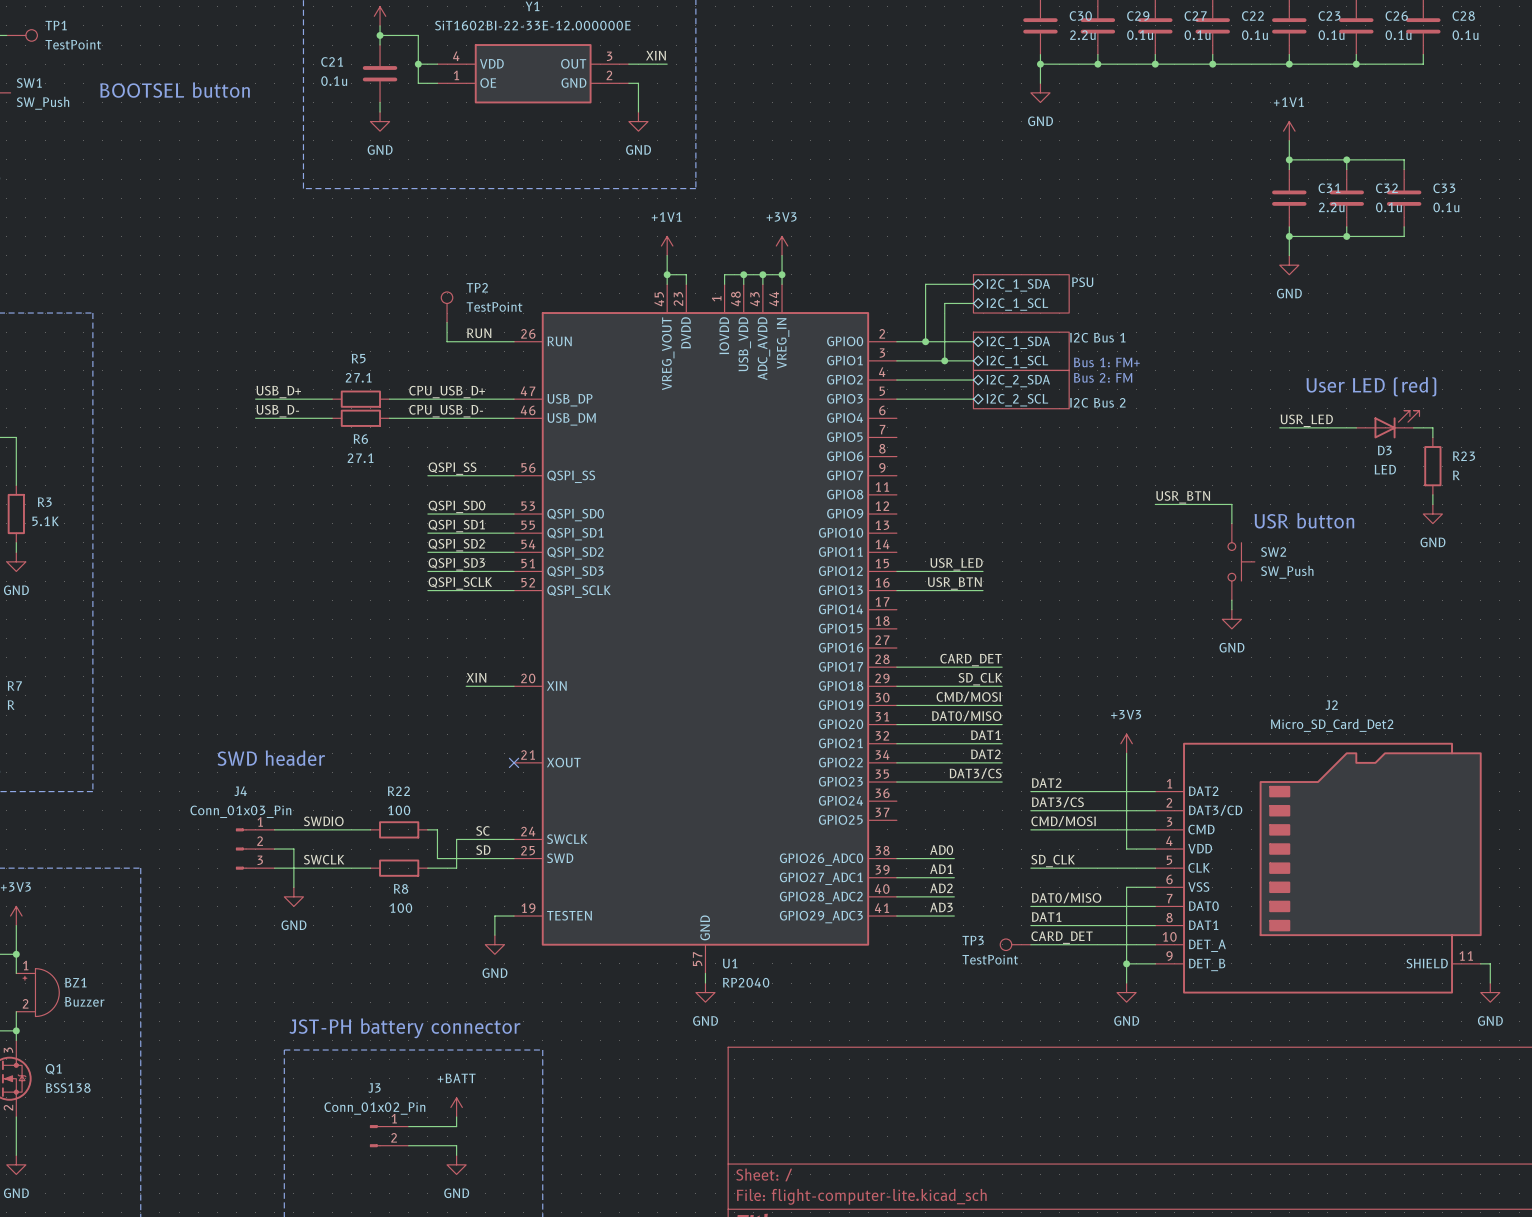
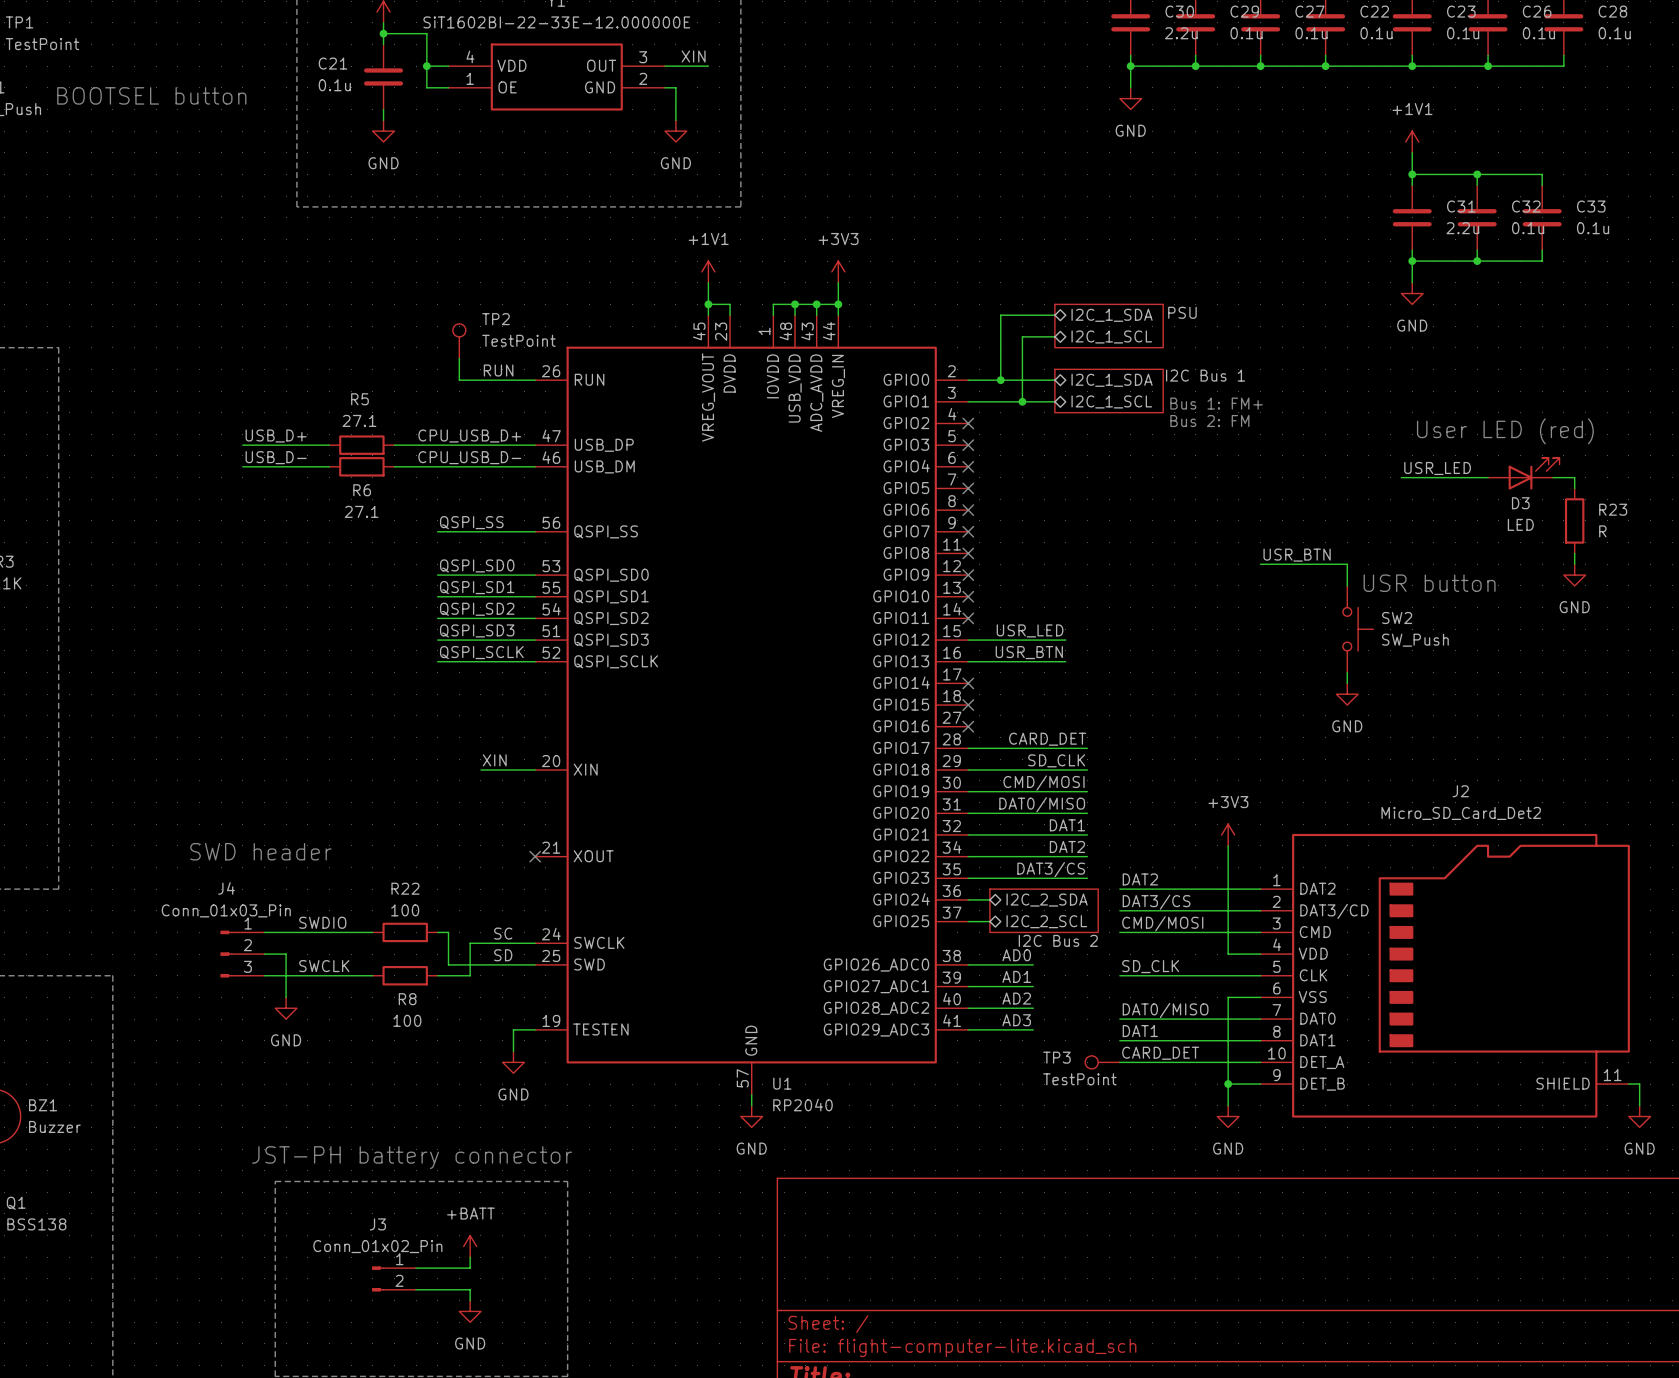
wire: (896, 380) (973, 380) -> none
no-connect mark: none -> (968, 423)
sheet pin: I2C_2_SDA (1018, 381) -> none
sheet I2C Bus 2 position: (1021, 389) -> (1044, 910)
wire: (896, 399) (973, 399) -> none
no-connect mark: none -> (968, 445)
sheet pin: I2C_2_SCL (1017, 400) -> none
sheet I2C Bus 2 name position: I2C Bus 2 (1097, 402) -> I2C Bus 2 (1058, 940)
no-connect mark: none -> (968, 466)
no-connect mark: none -> (968, 488)
no-connect mark: none -> (968, 510)
no-connect mark: none -> (968, 531)
no-connect mark: none -> (968, 553)
no-connect mark: none -> (968, 575)
no-connect mark: none -> (968, 596)
no-connect mark: none -> (968, 618)
no-connect mark: none -> (968, 683)
no-connect mark: none -> (968, 705)
no-connect mark: none -> (968, 726)
wire: none -> (968, 899) (989, 899)
sheet pin: none -> I2C_2_SDA (1047, 900)
wire: none -> (968, 921) (989, 921)
sheet pin: none -> I2C_2_SCL (1046, 921)

